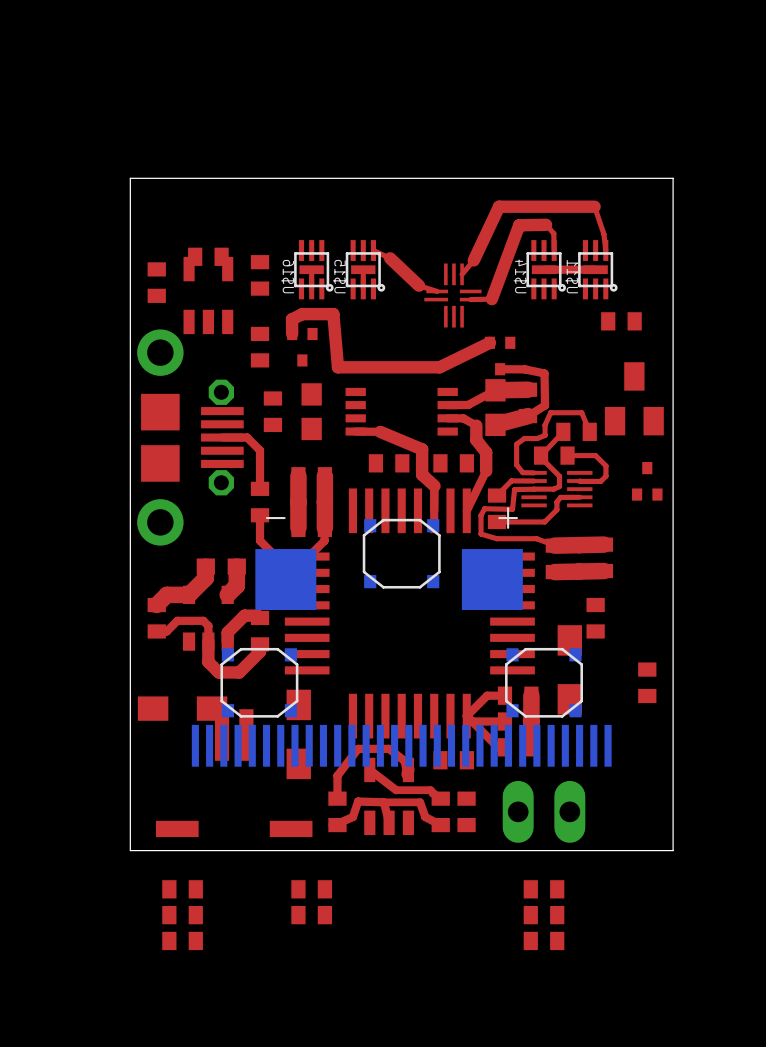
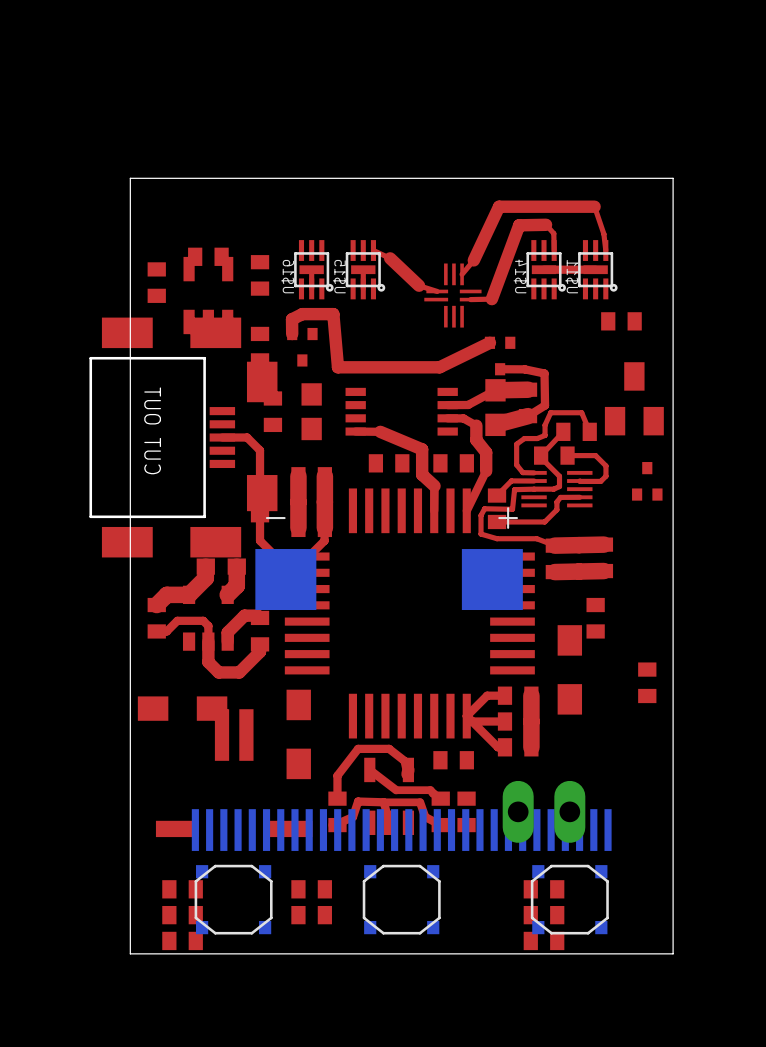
part footprint: [137, 329, 244, 546] -> [89, 317, 278, 558]
part: (401, 553) -> none
part: (259, 682) -> none
part: (544, 682) -> none
part position: (401, 745) -> (401, 830)
board edge: (673, 850) (130, 850) -> (673, 850) (673, 953) (130, 953) (130, 850)
part: none -> (233, 899)
part: none -> (401, 899)
part: none -> (569, 899)

